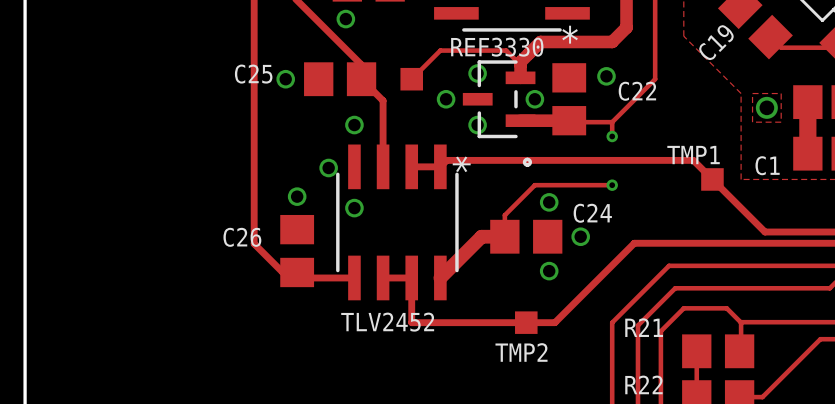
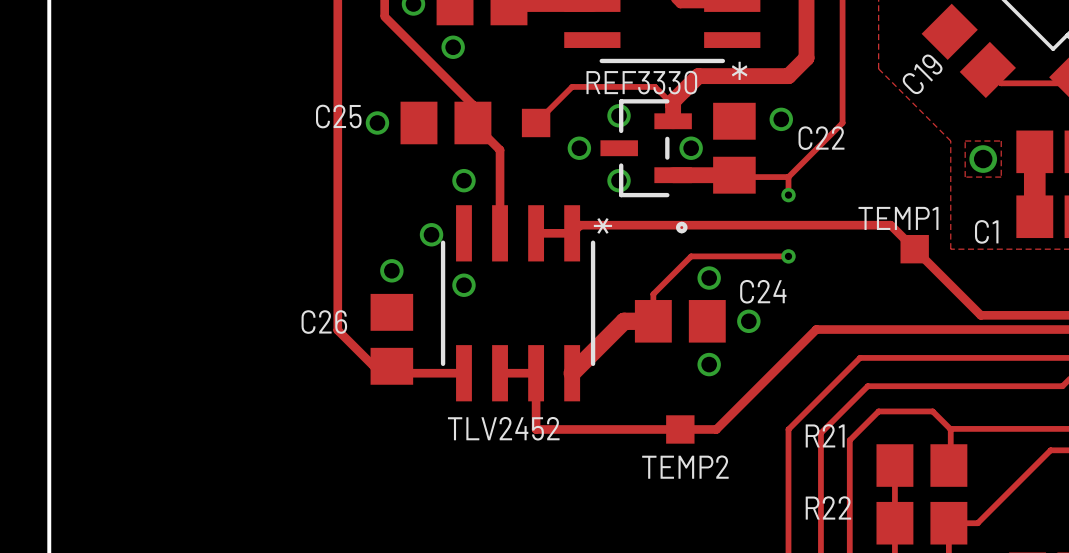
TMP1 name: TMP1 (693, 155) -> TEMP1 (898, 218)
TMP2 name: TMP2 (521, 352) -> TEMP2 (685, 467)

